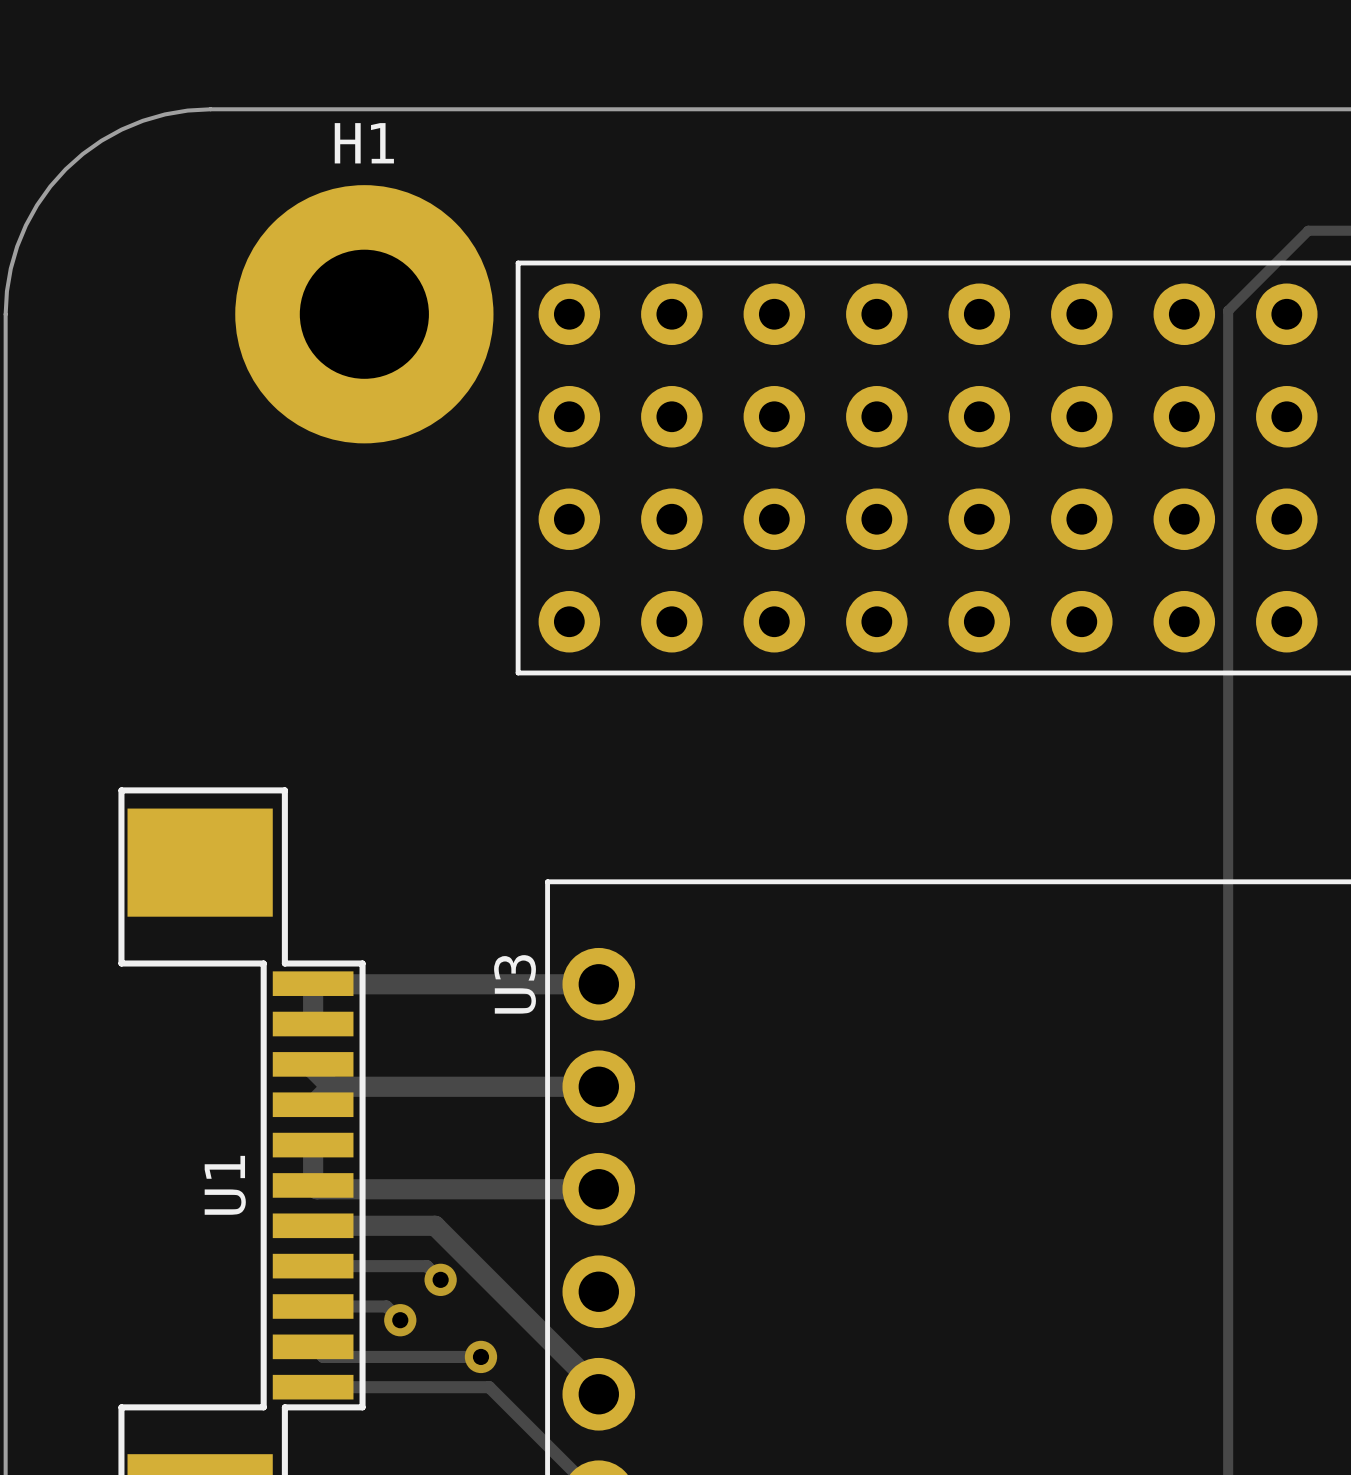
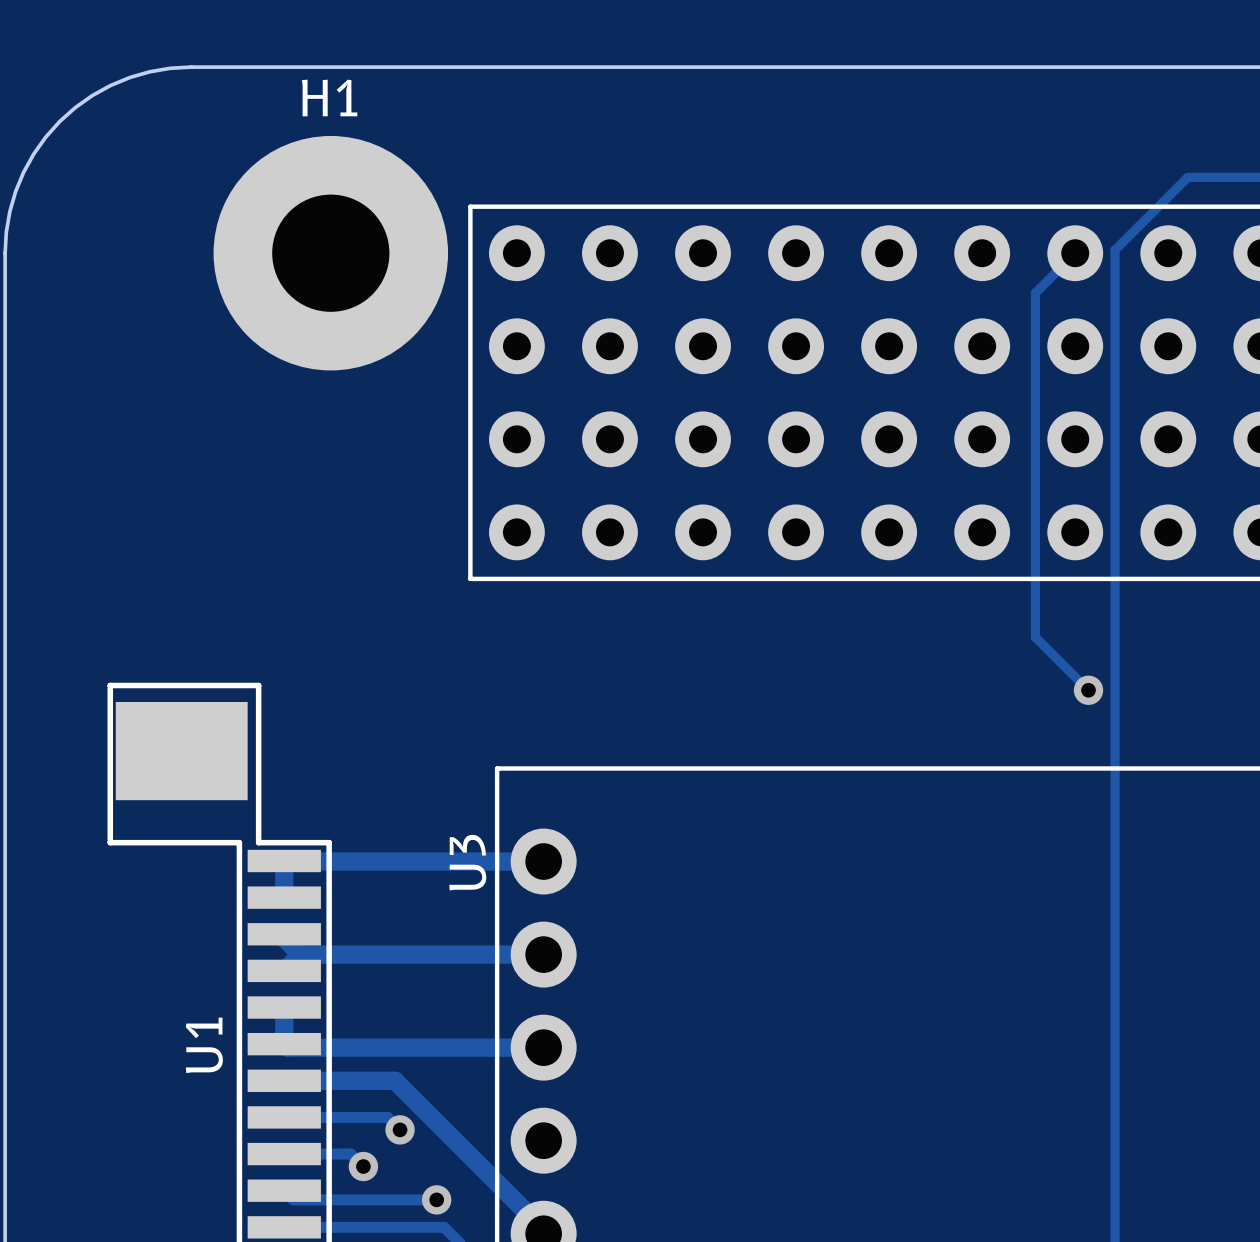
track: none -> (1075, 253) (1035, 293) (1035, 637) (1088, 690)
via: none -> (1088, 690)

